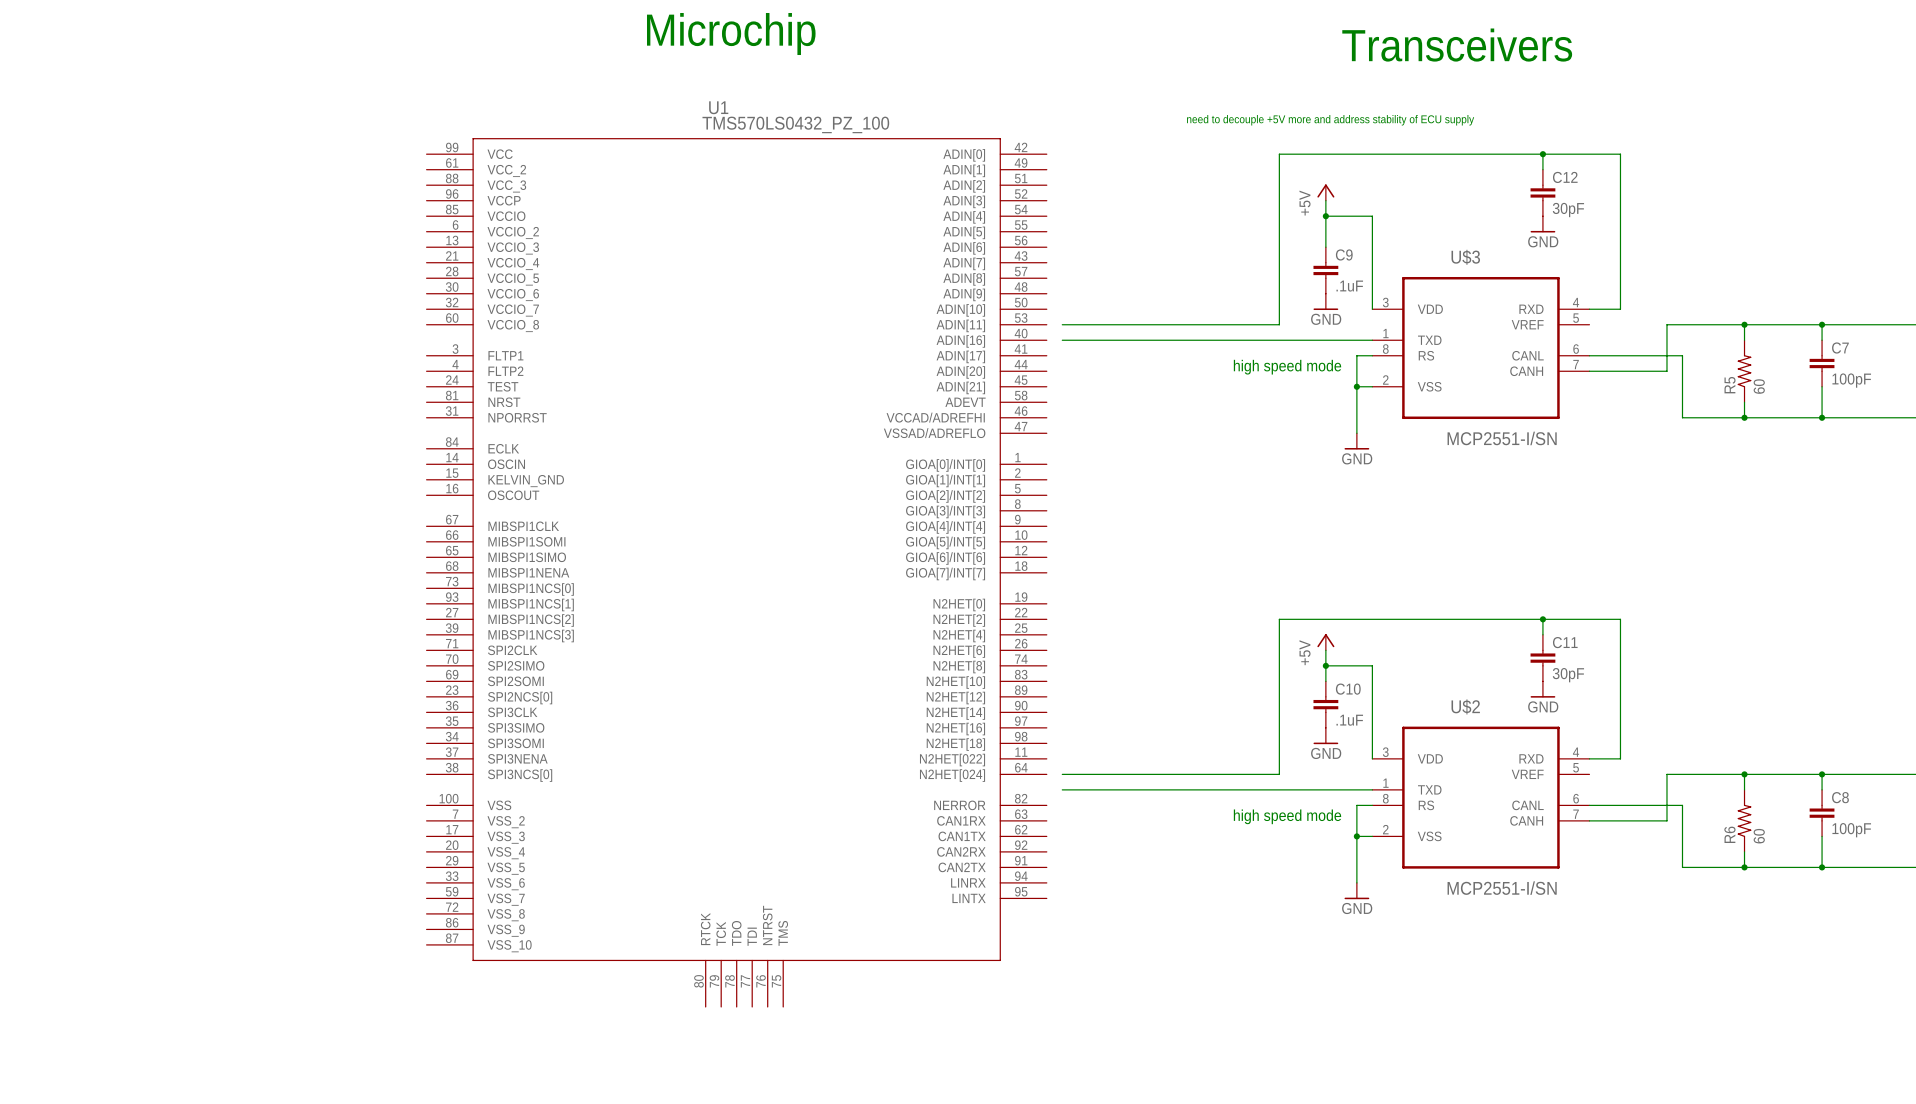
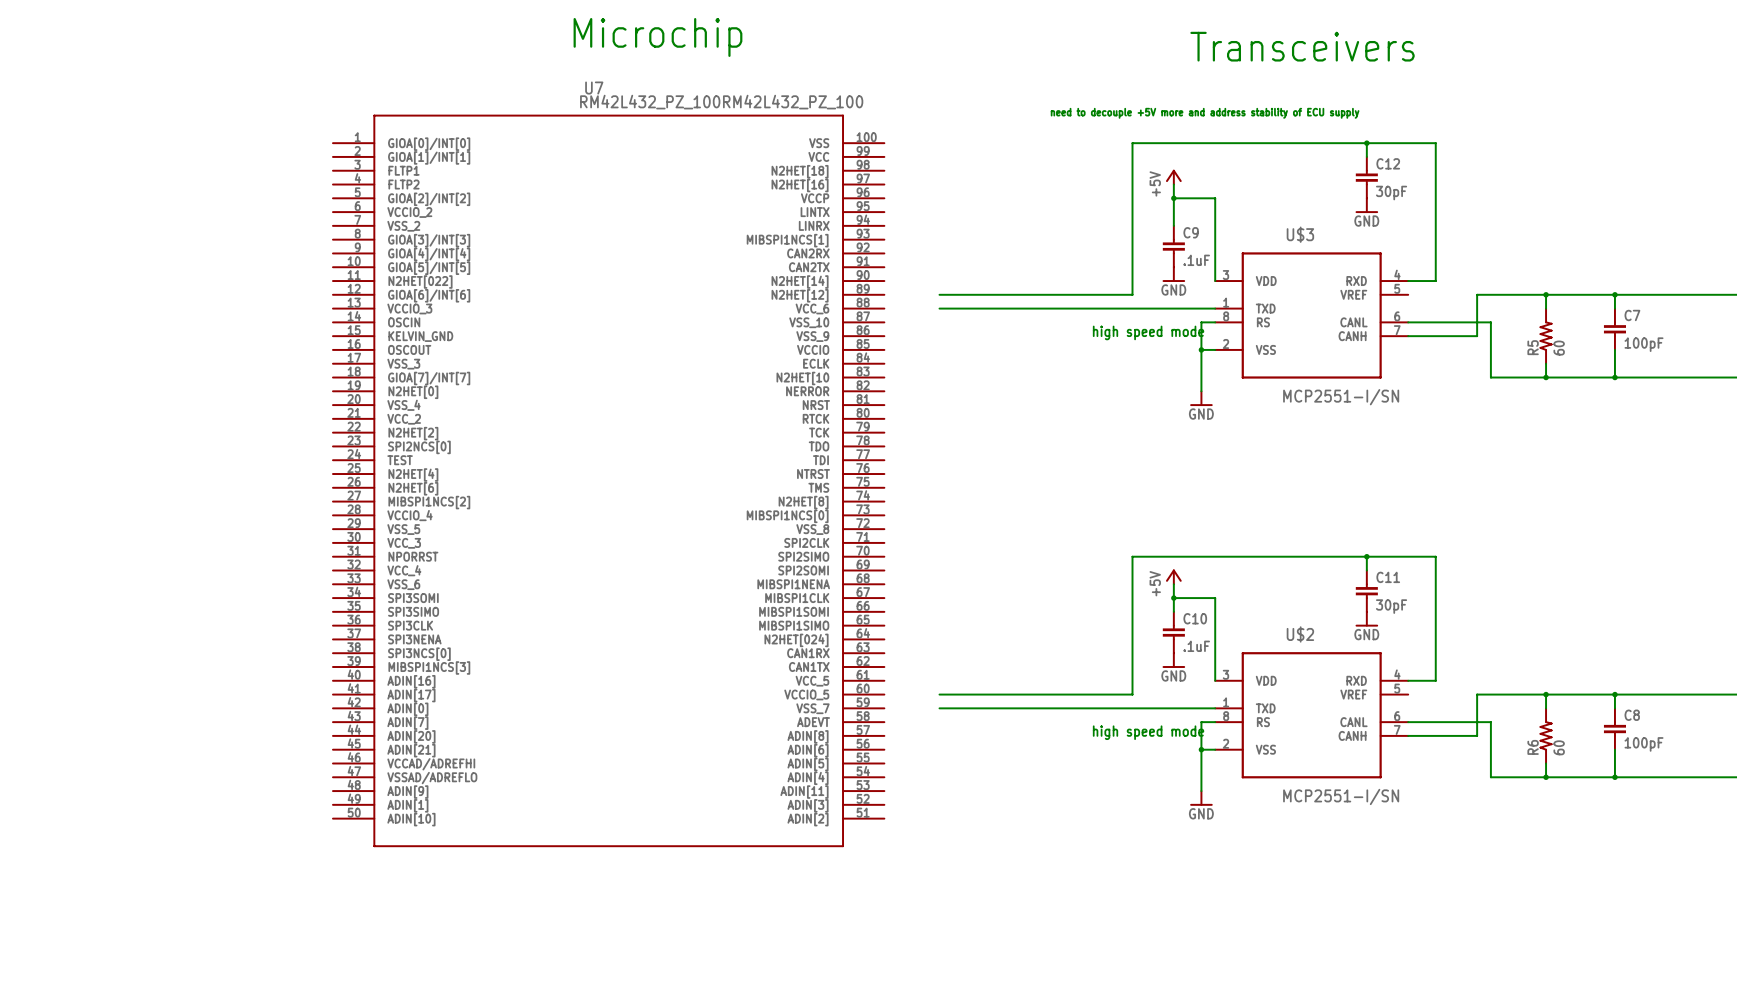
U7: none -> RM42L432_PZ_100RM42L432_PZ_100 (608, 480)
U1: TMS570LS0432_PZ_100 (736, 572) -> none

